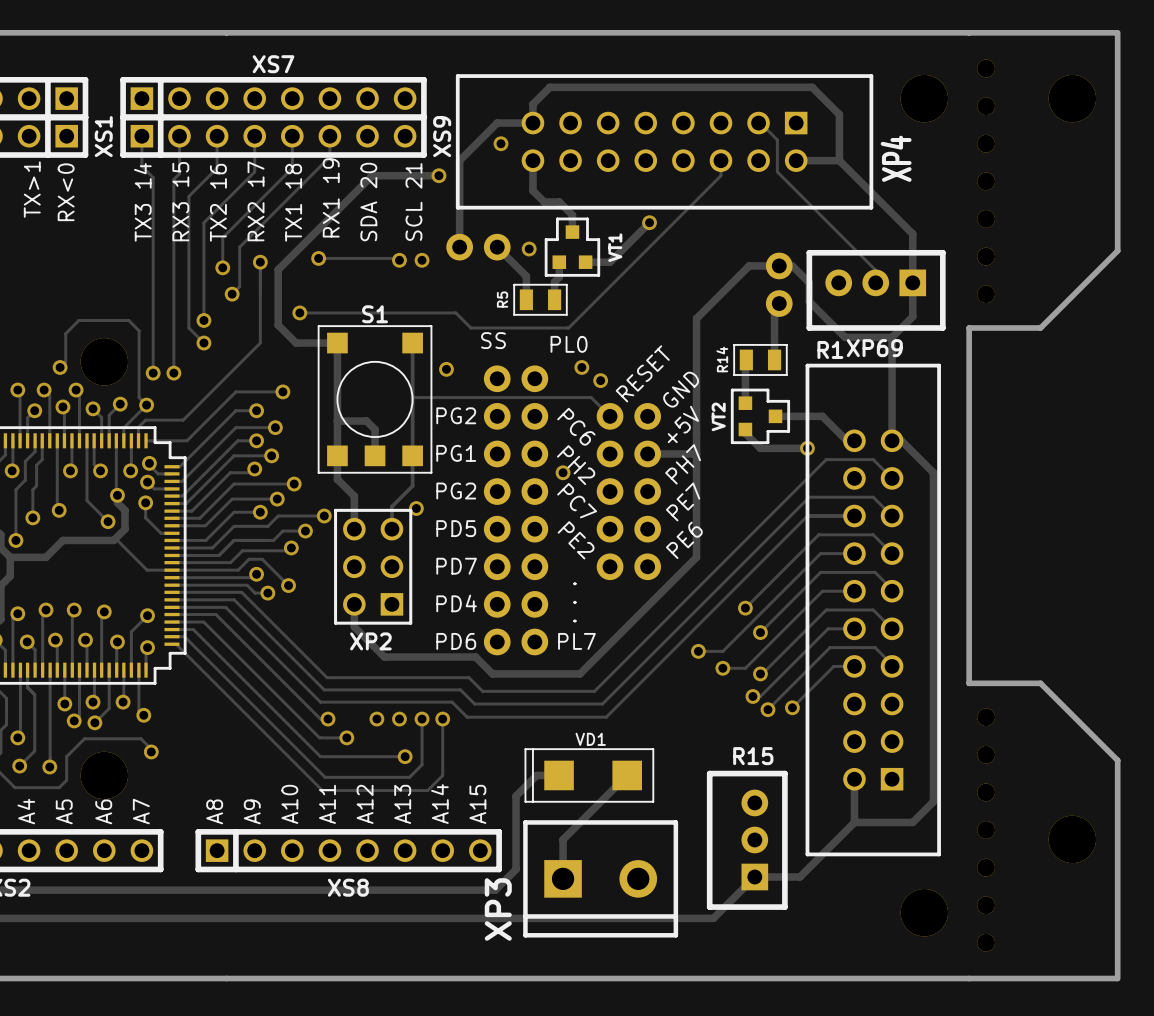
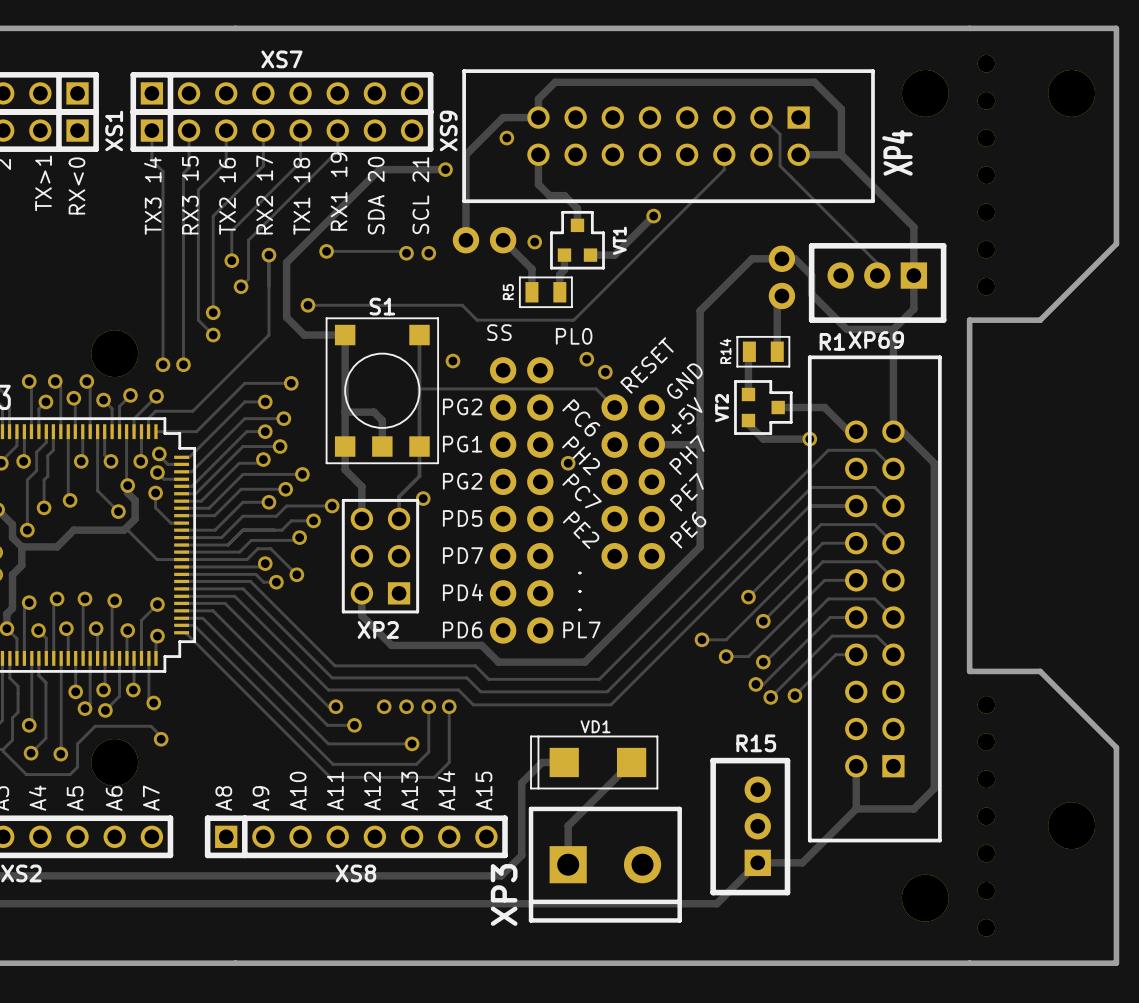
track: (60, 367) (65, 361) (65, 333) (78, 320) (128, 320) (139, 330) (139, 397) (146, 405) -> none
via: (60, 367) -> none

